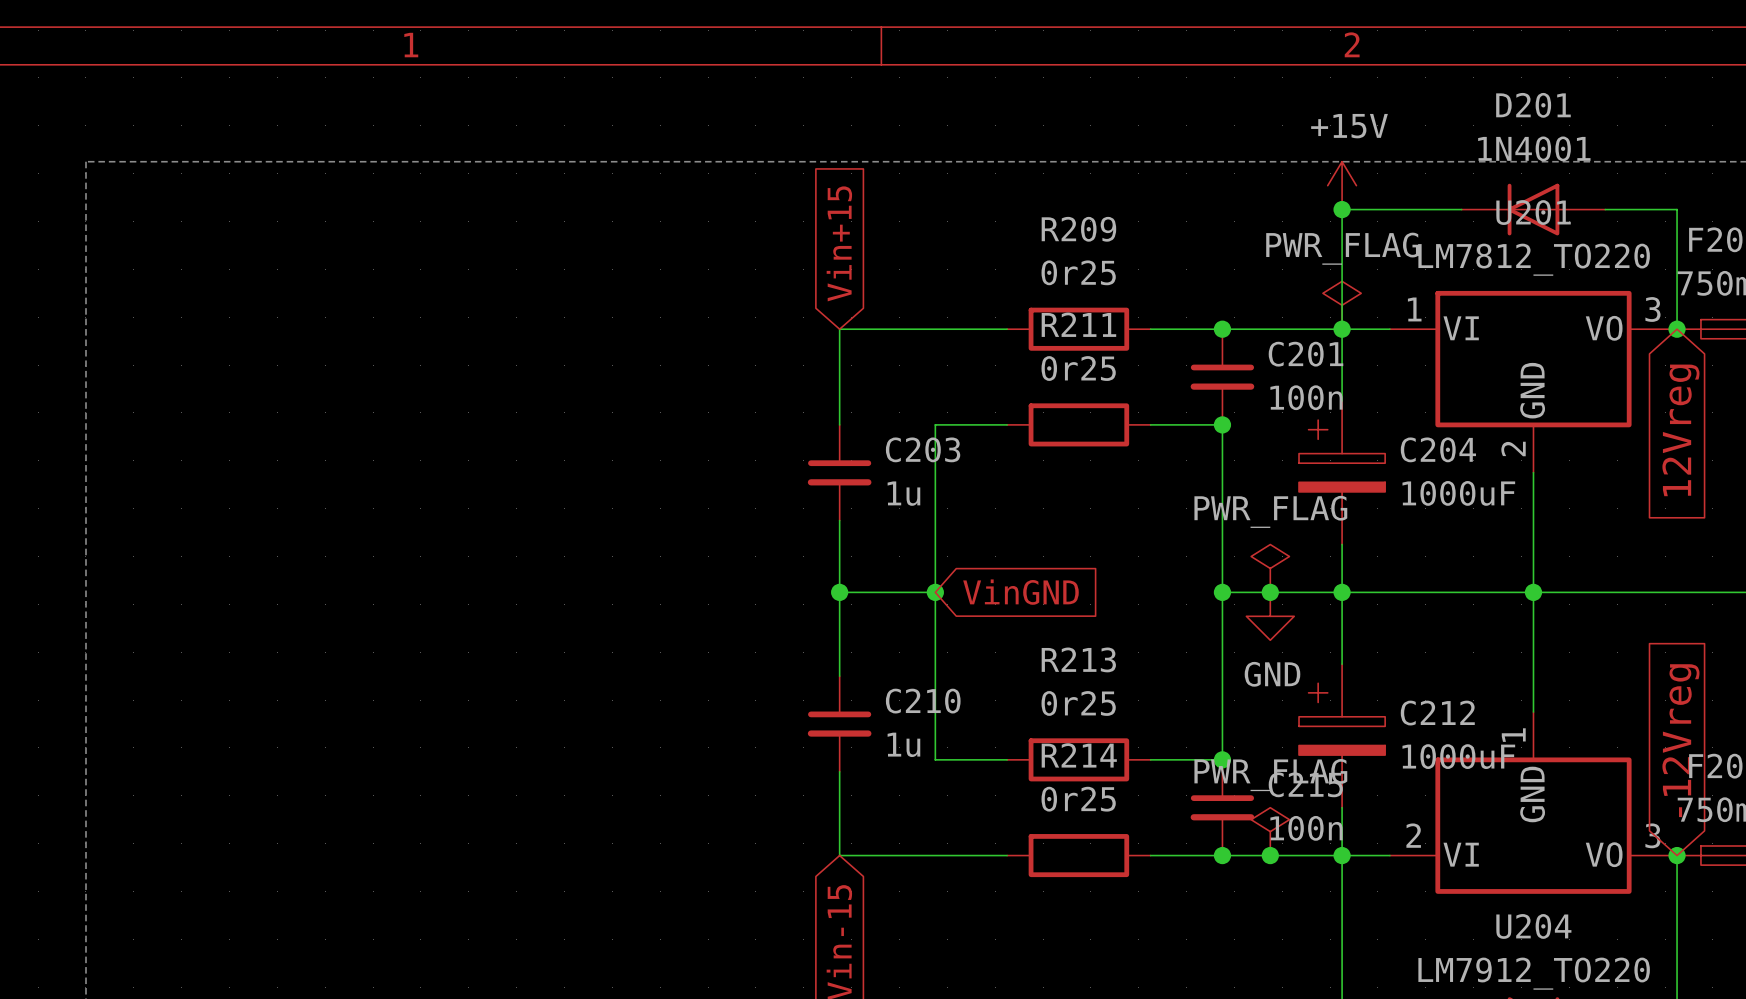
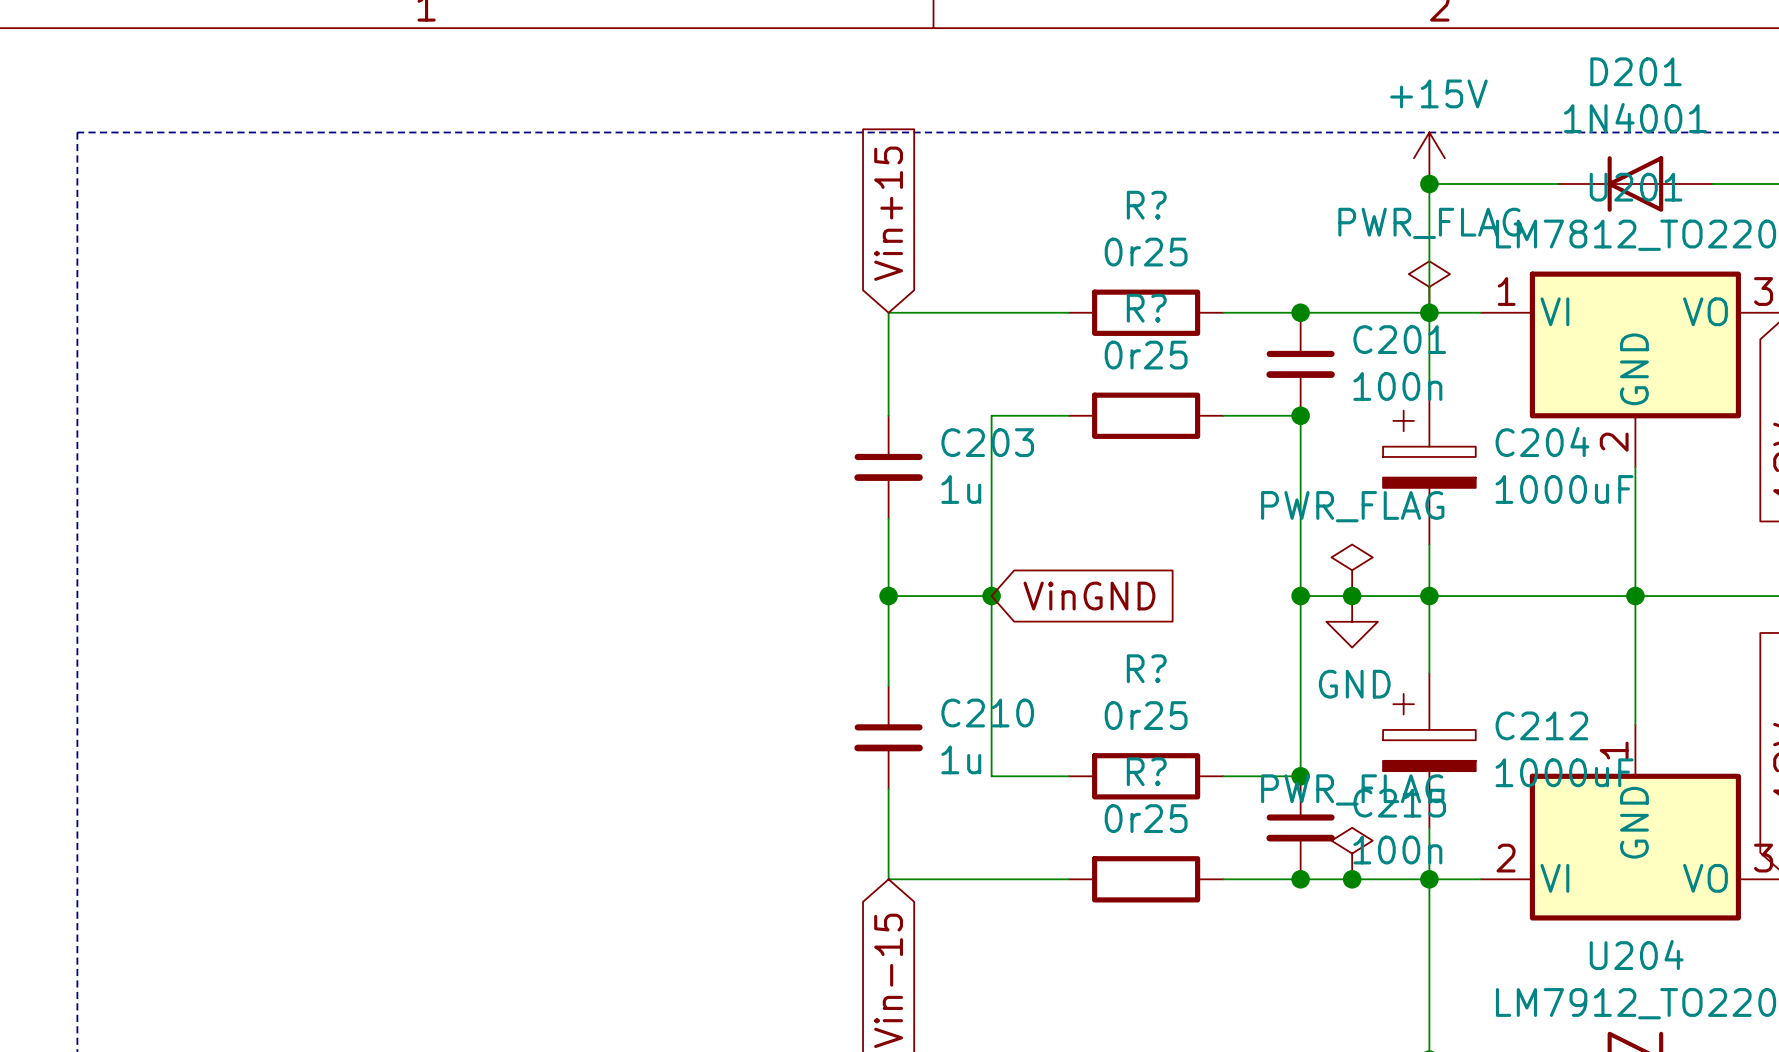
R209 name: R209 (1078, 229) -> R? (1146, 205)
R211 name: R211 (1078, 324) -> R? (1146, 308)
R213 name: R213 (1078, 659) -> R? (1146, 668)
R214 name: R214 (1079, 755) -> R? (1146, 771)

